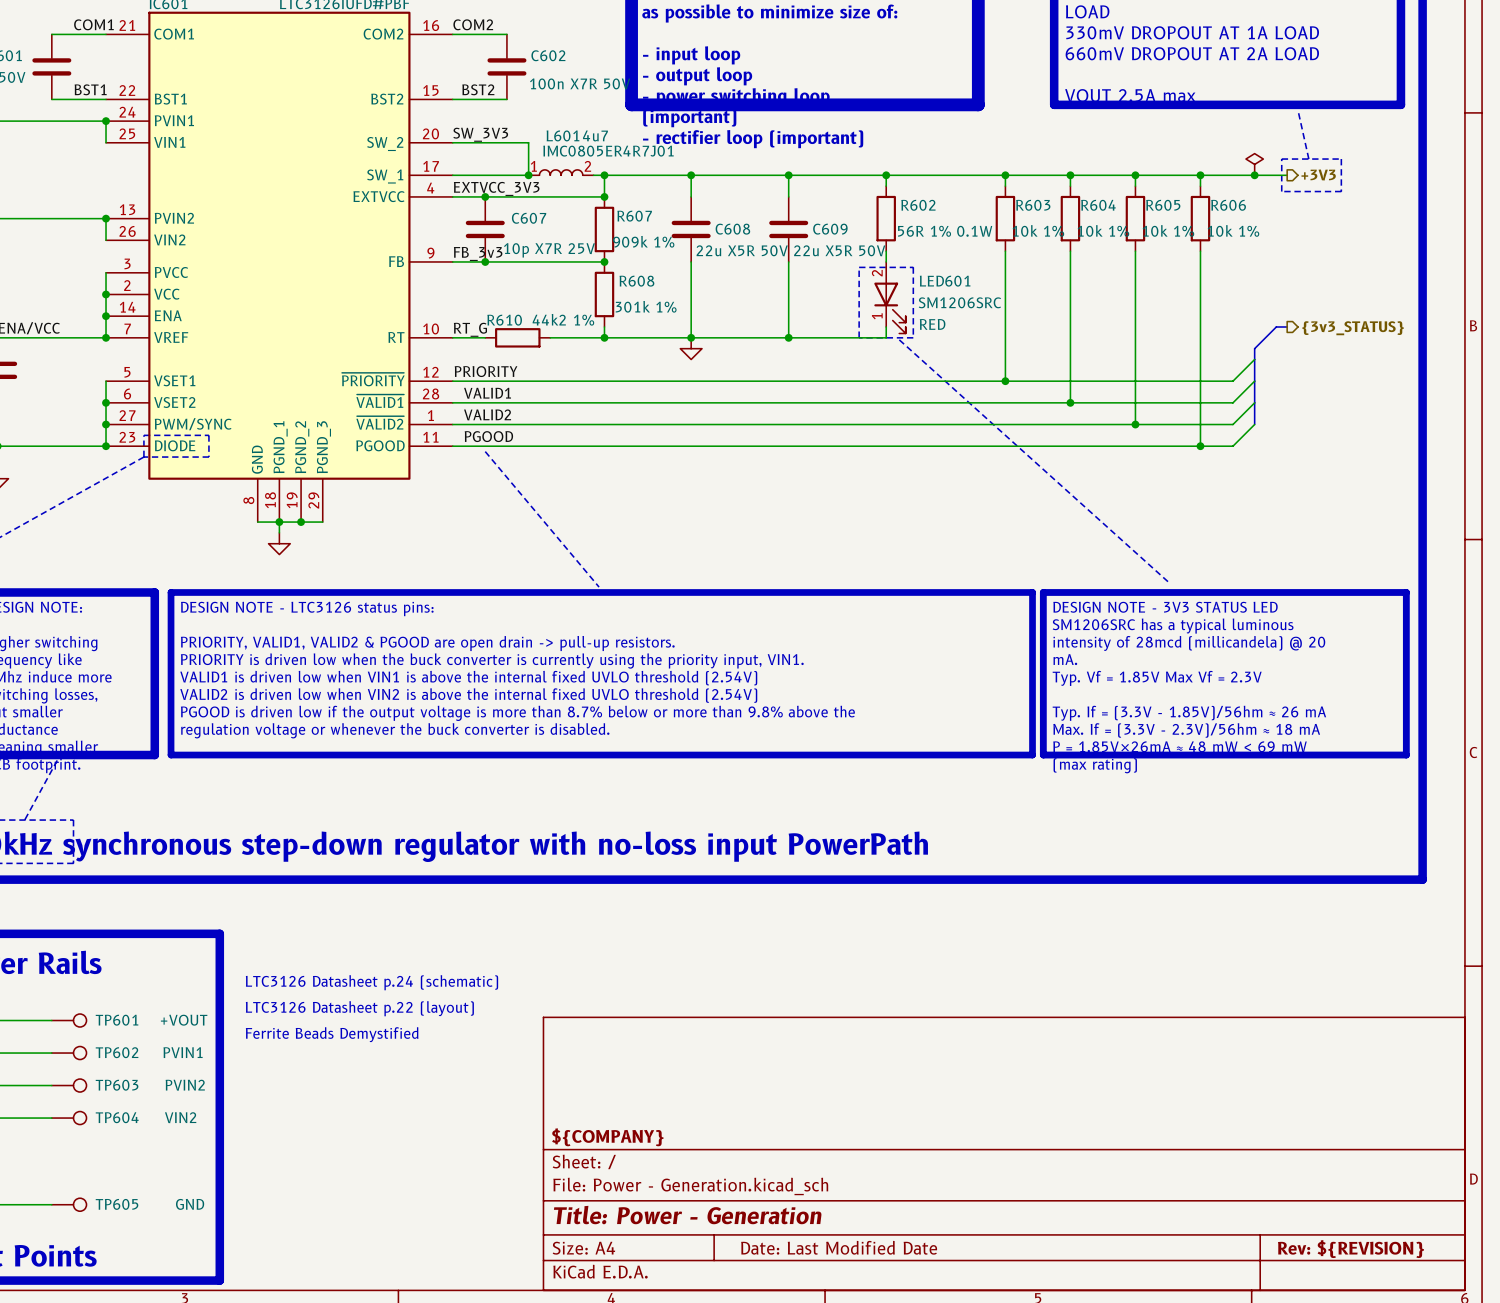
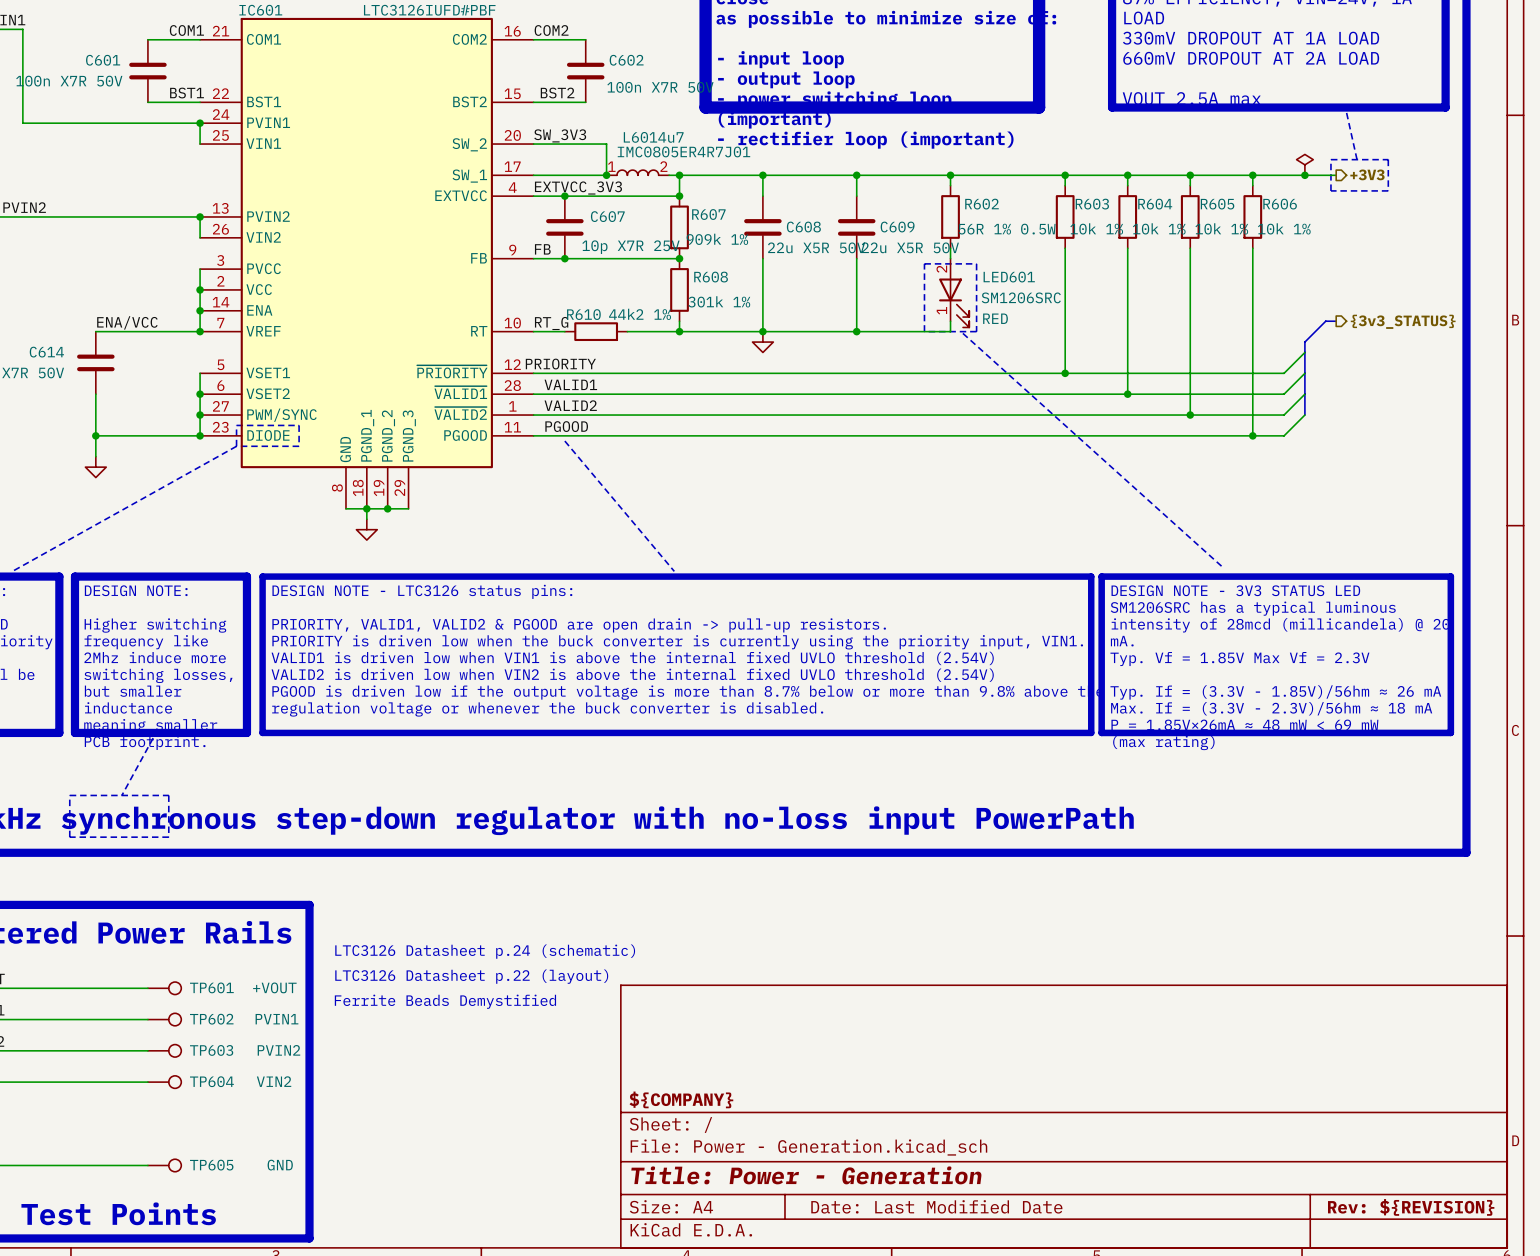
R602 value: 56R 1% 0.1W (945, 231) -> 56R 1% 0.5W (1007, 229)
label: FB_3v3 (478, 253) -> FB (542, 249)

